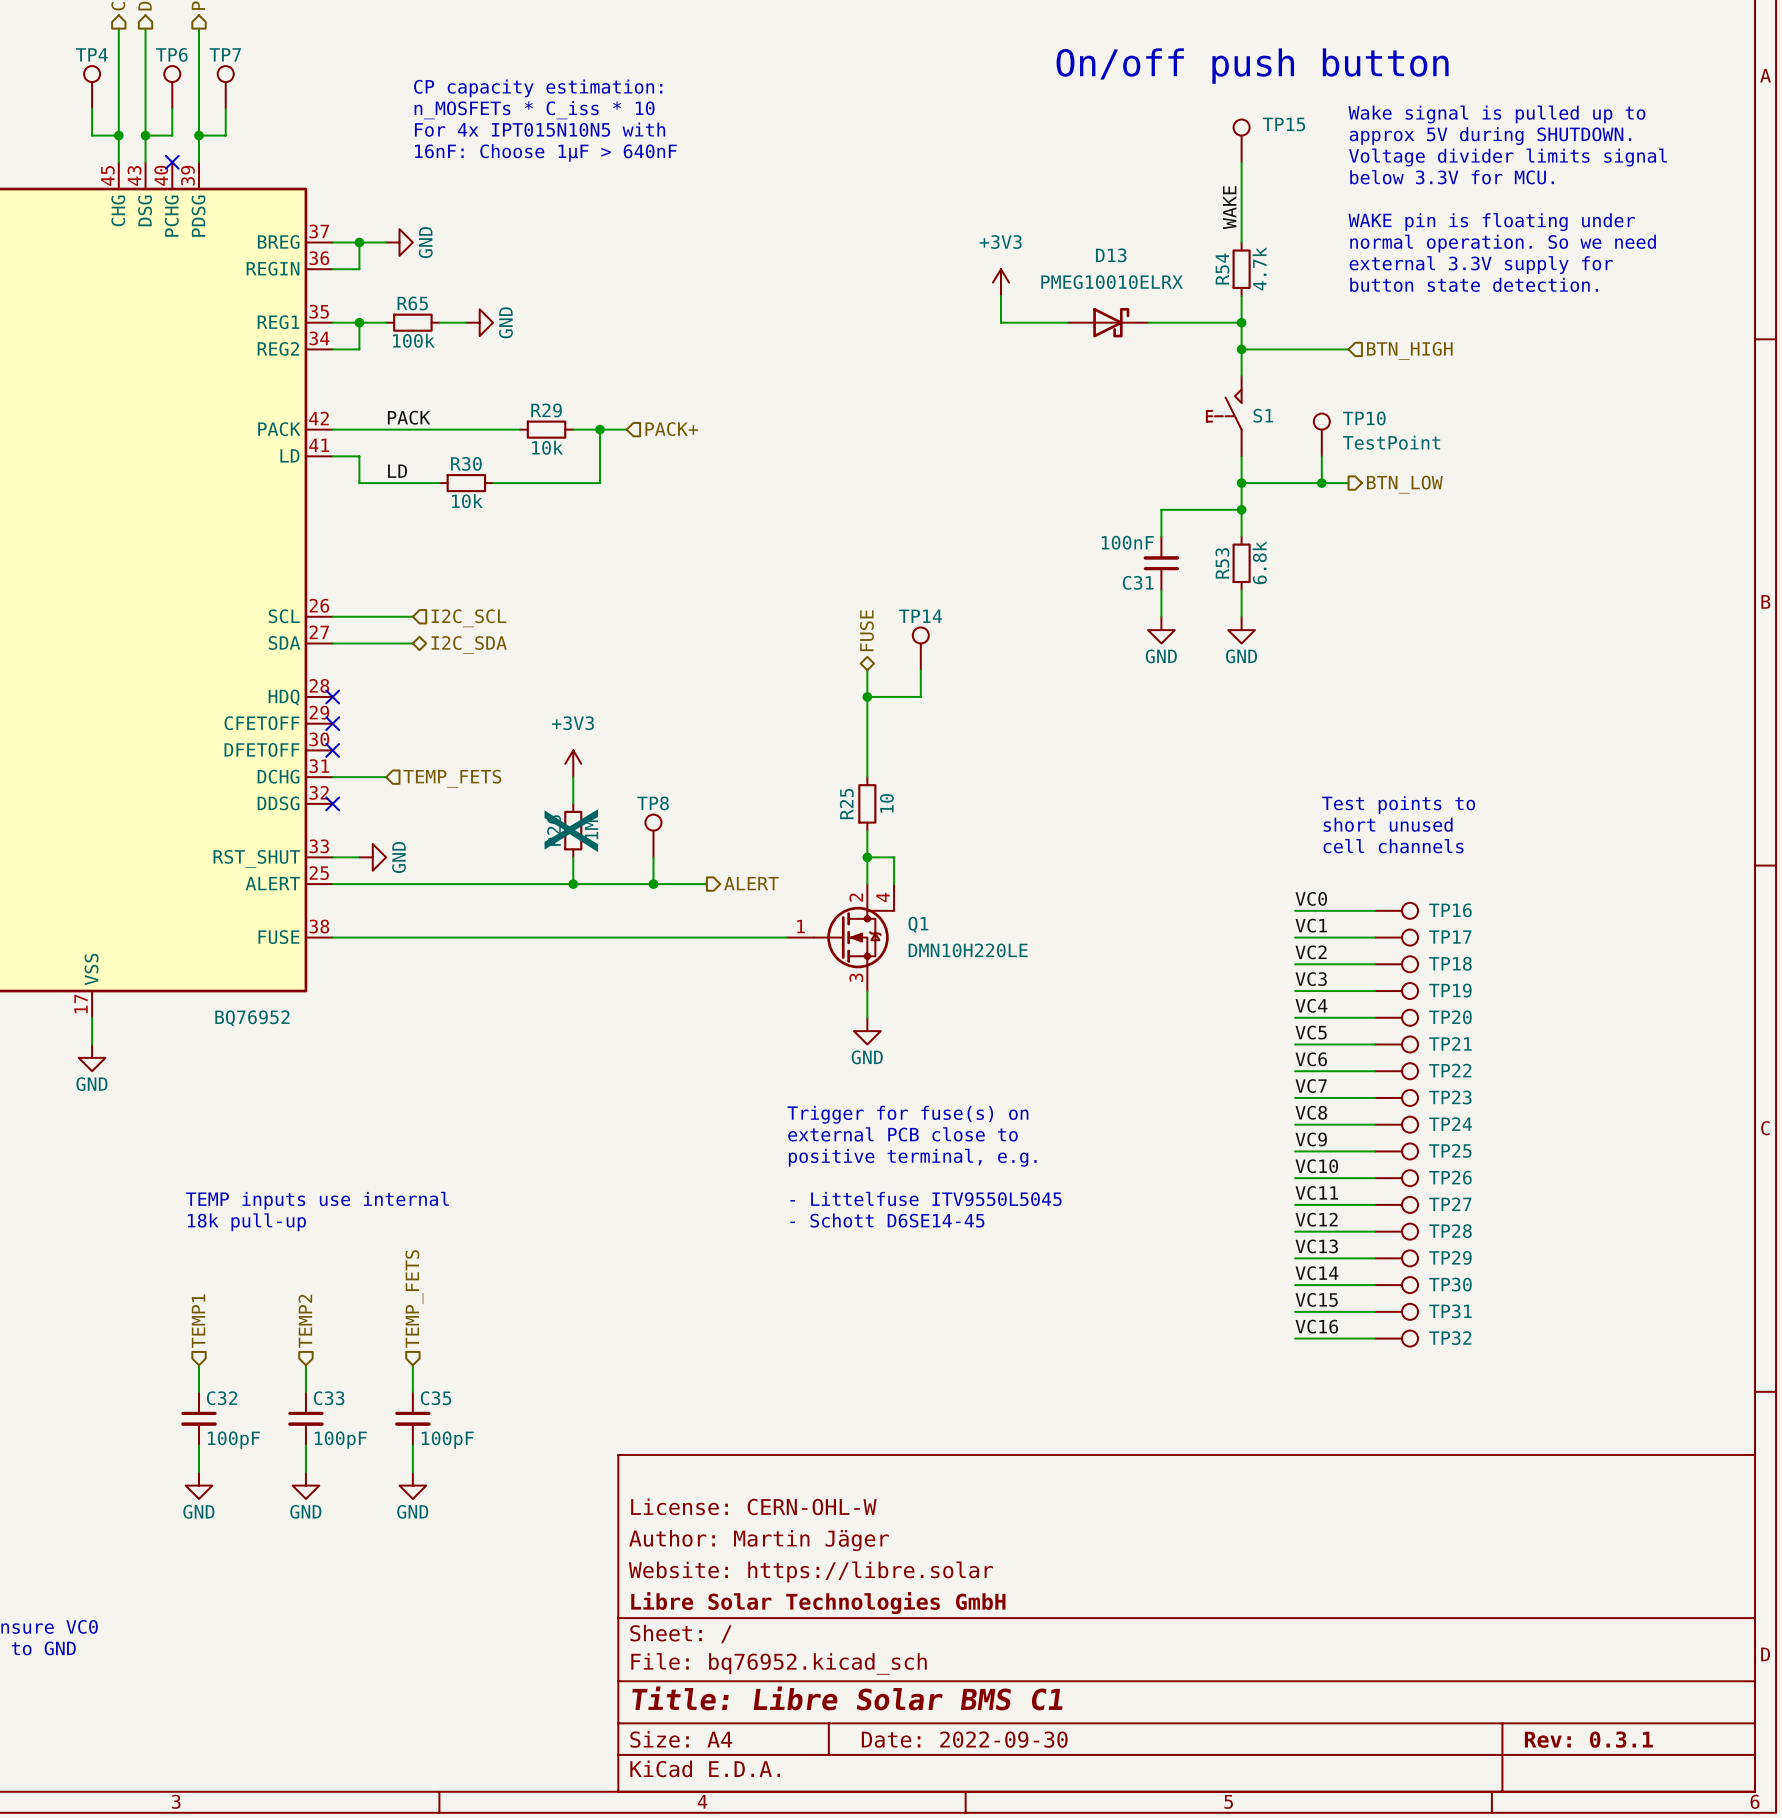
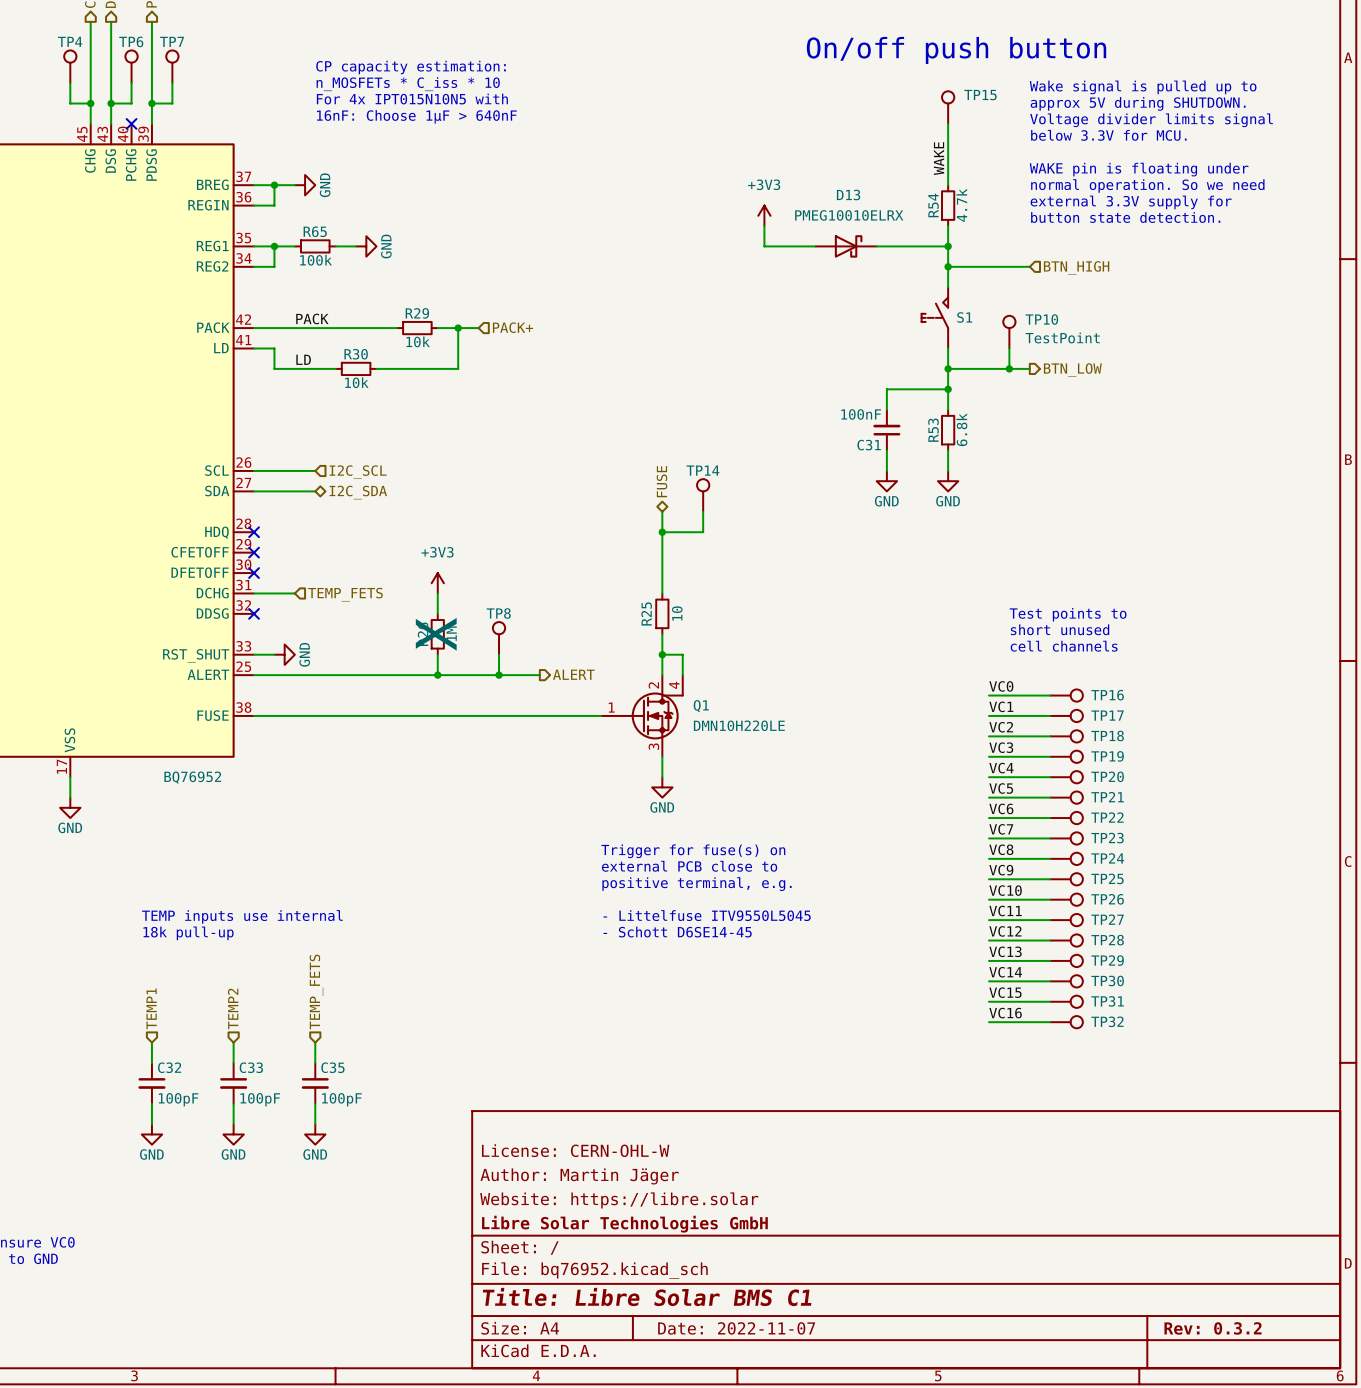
title block: Date: 2022-09-30 (964, 1739) -> Date: 2022-11-07 (736, 1328)
title block: Rev: 0.3.1 (1588, 1739) -> Rev: 0.3.2 (1213, 1328)

